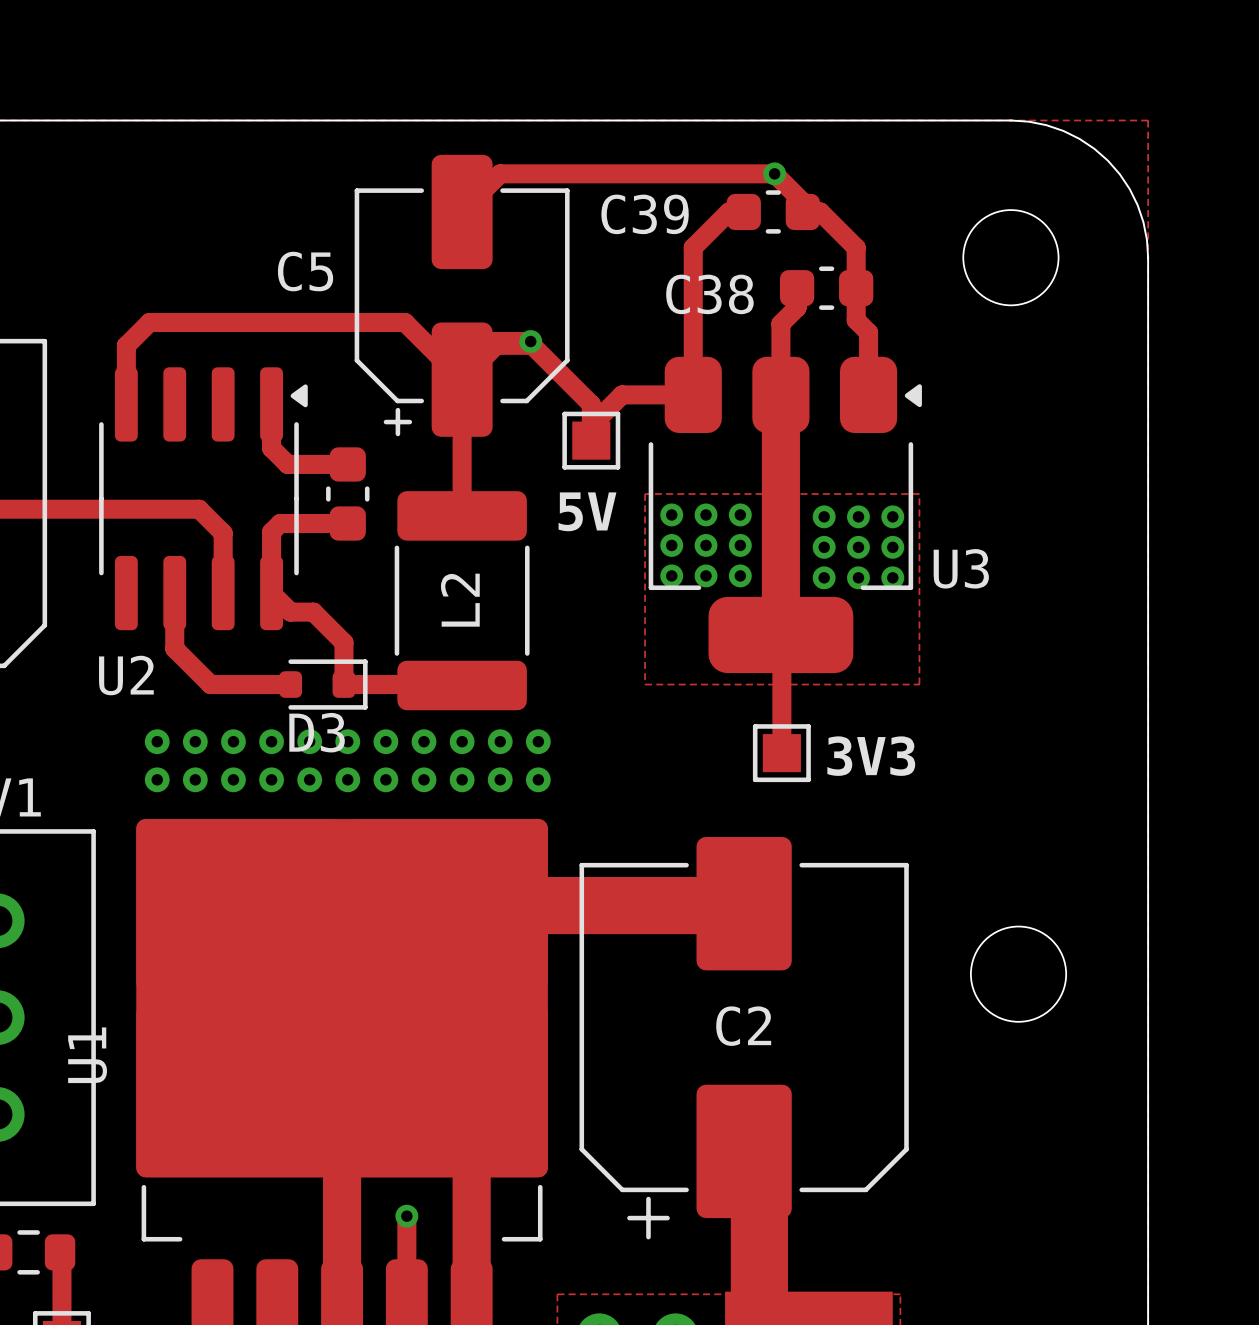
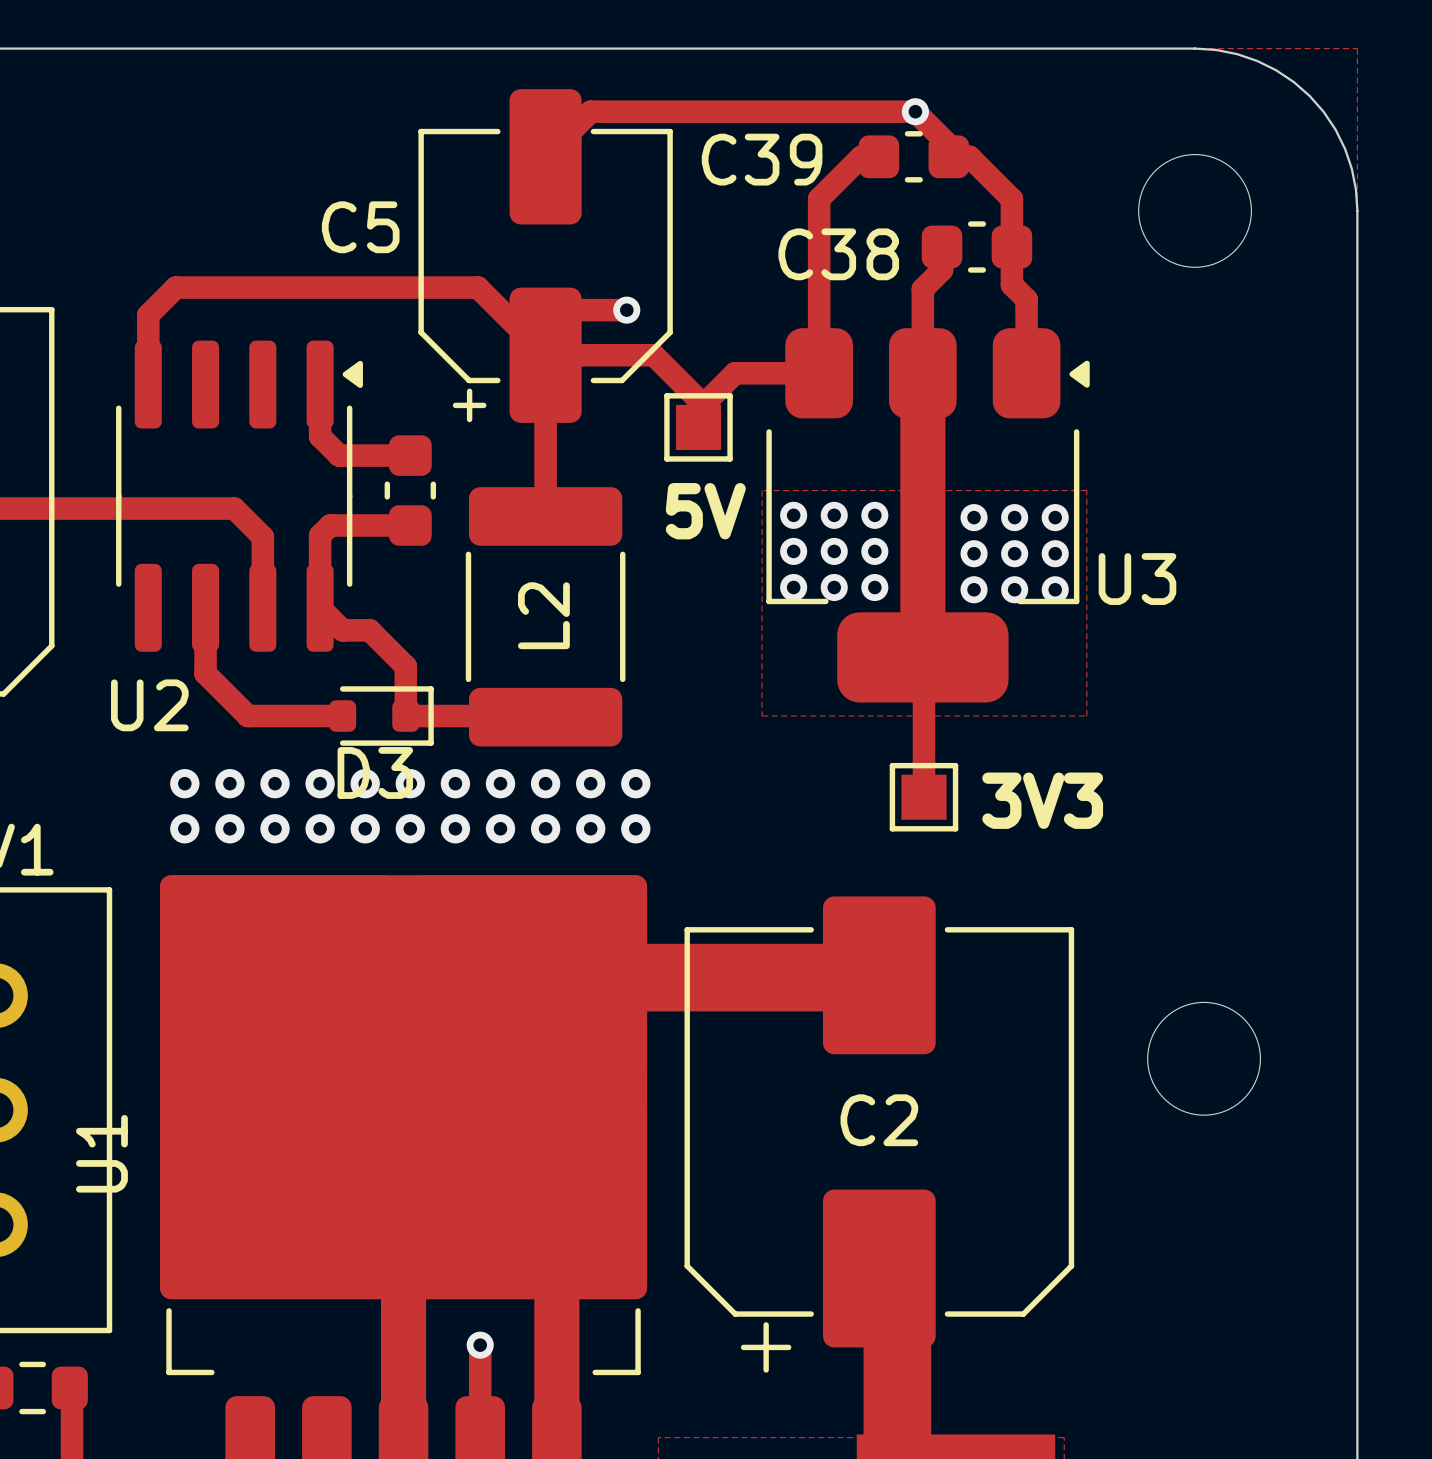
track: (462, 379) (496, 345) (532, 345) (591, 404) (591, 417) -> (545, 355) (653, 355) (698, 399)

